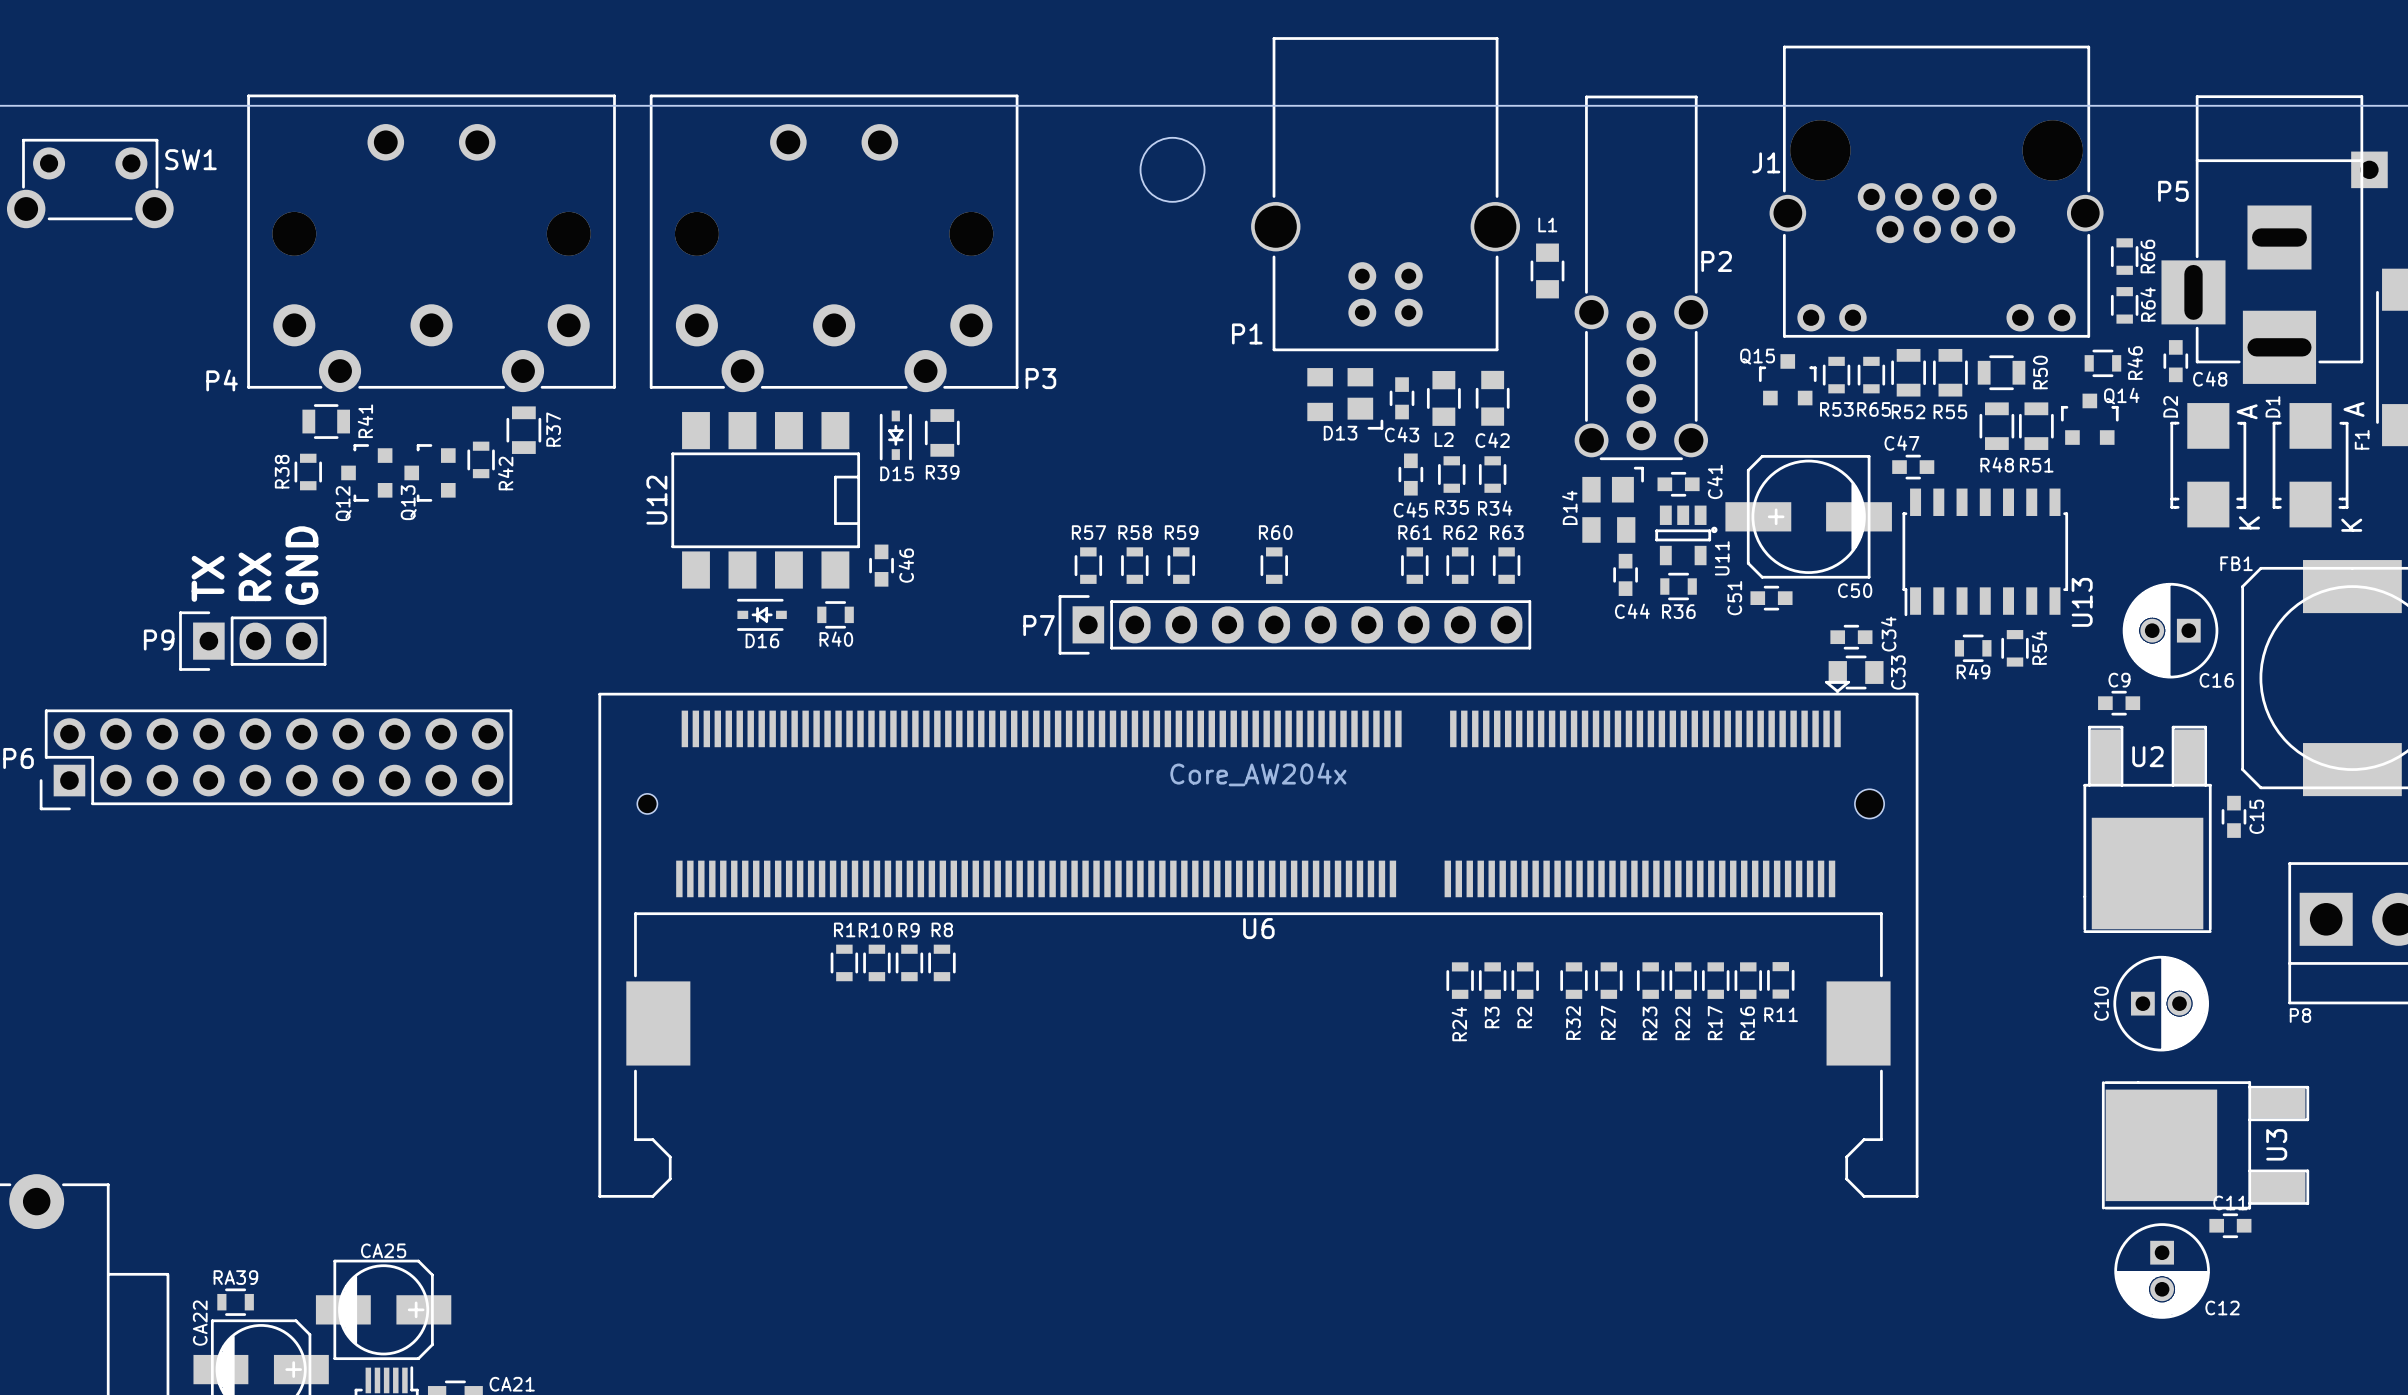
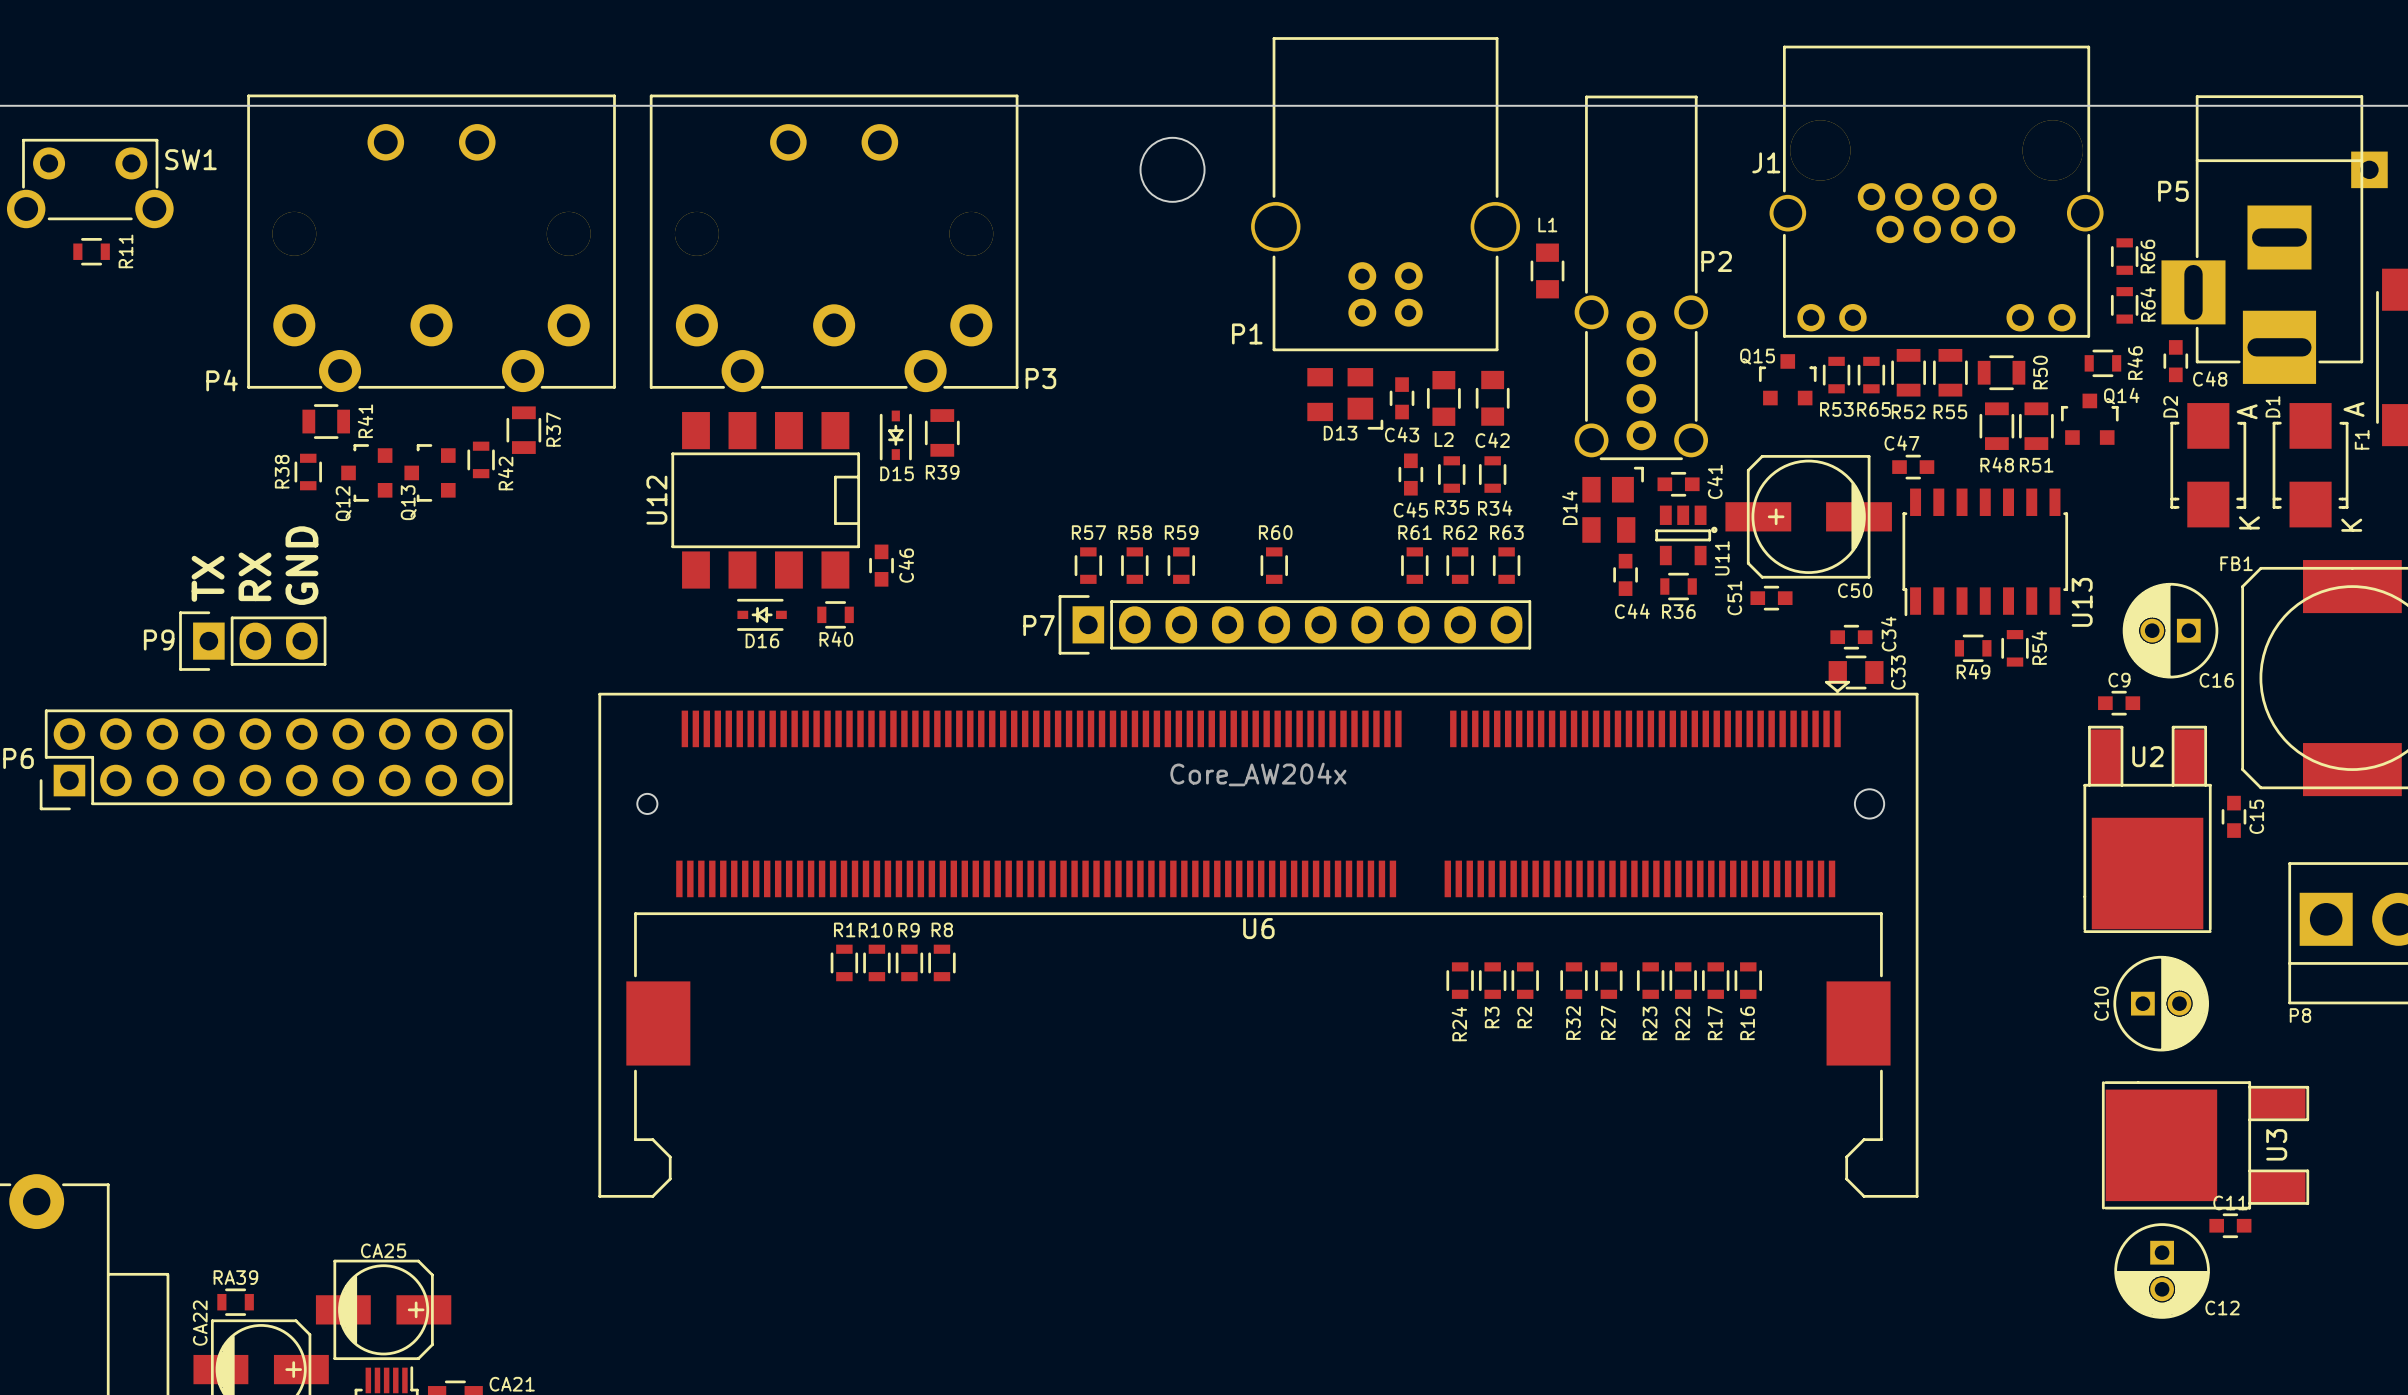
R11 rotation: 0° (1780, 980) -> 90° clockwise (91, 251)
R11 position: (1780, 980) -> (91, 251)
R11 name position: R11 (1781, 1014) -> R11 (125, 251)

